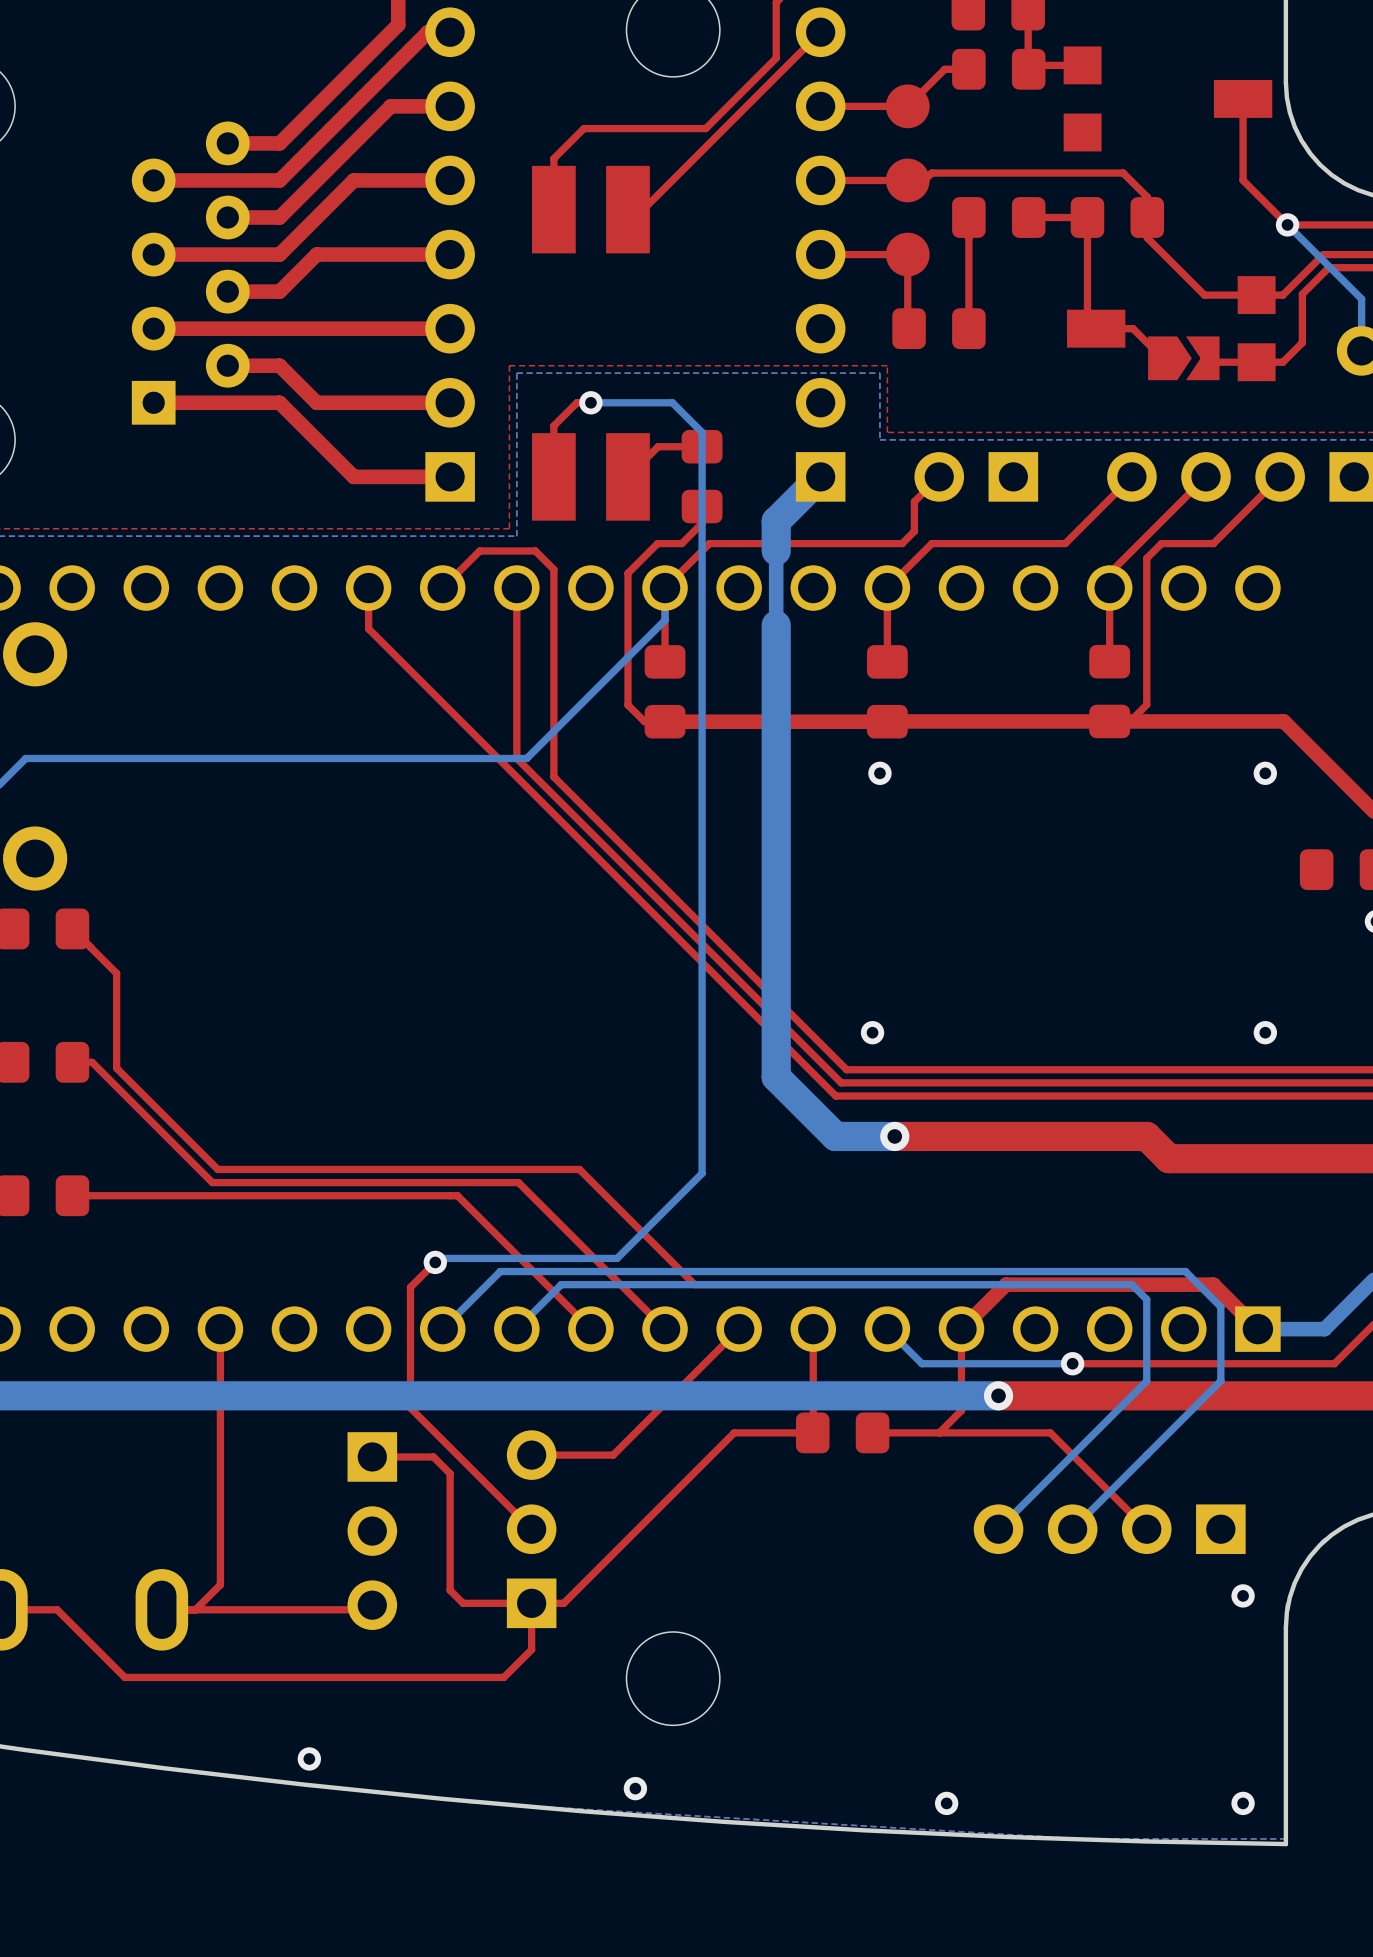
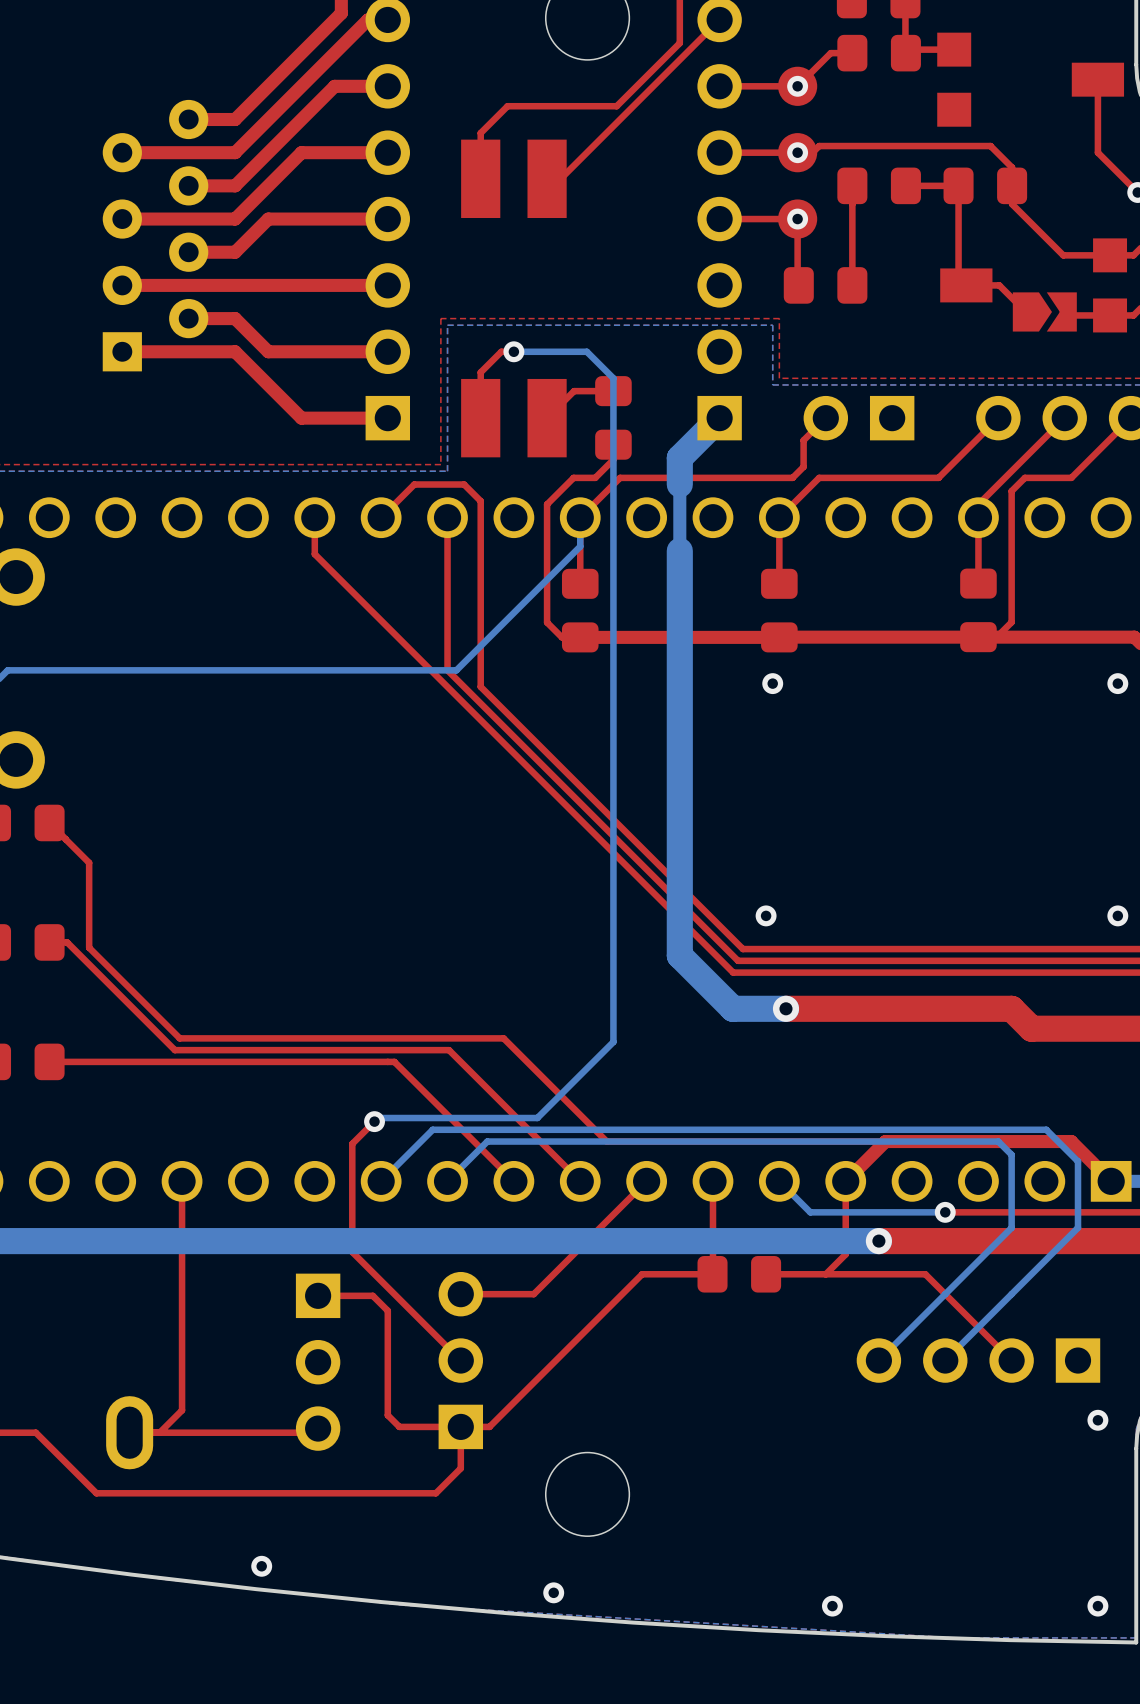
via: none -> (797, 86)
via: none -> (797, 152)
via: none -> (797, 219)

